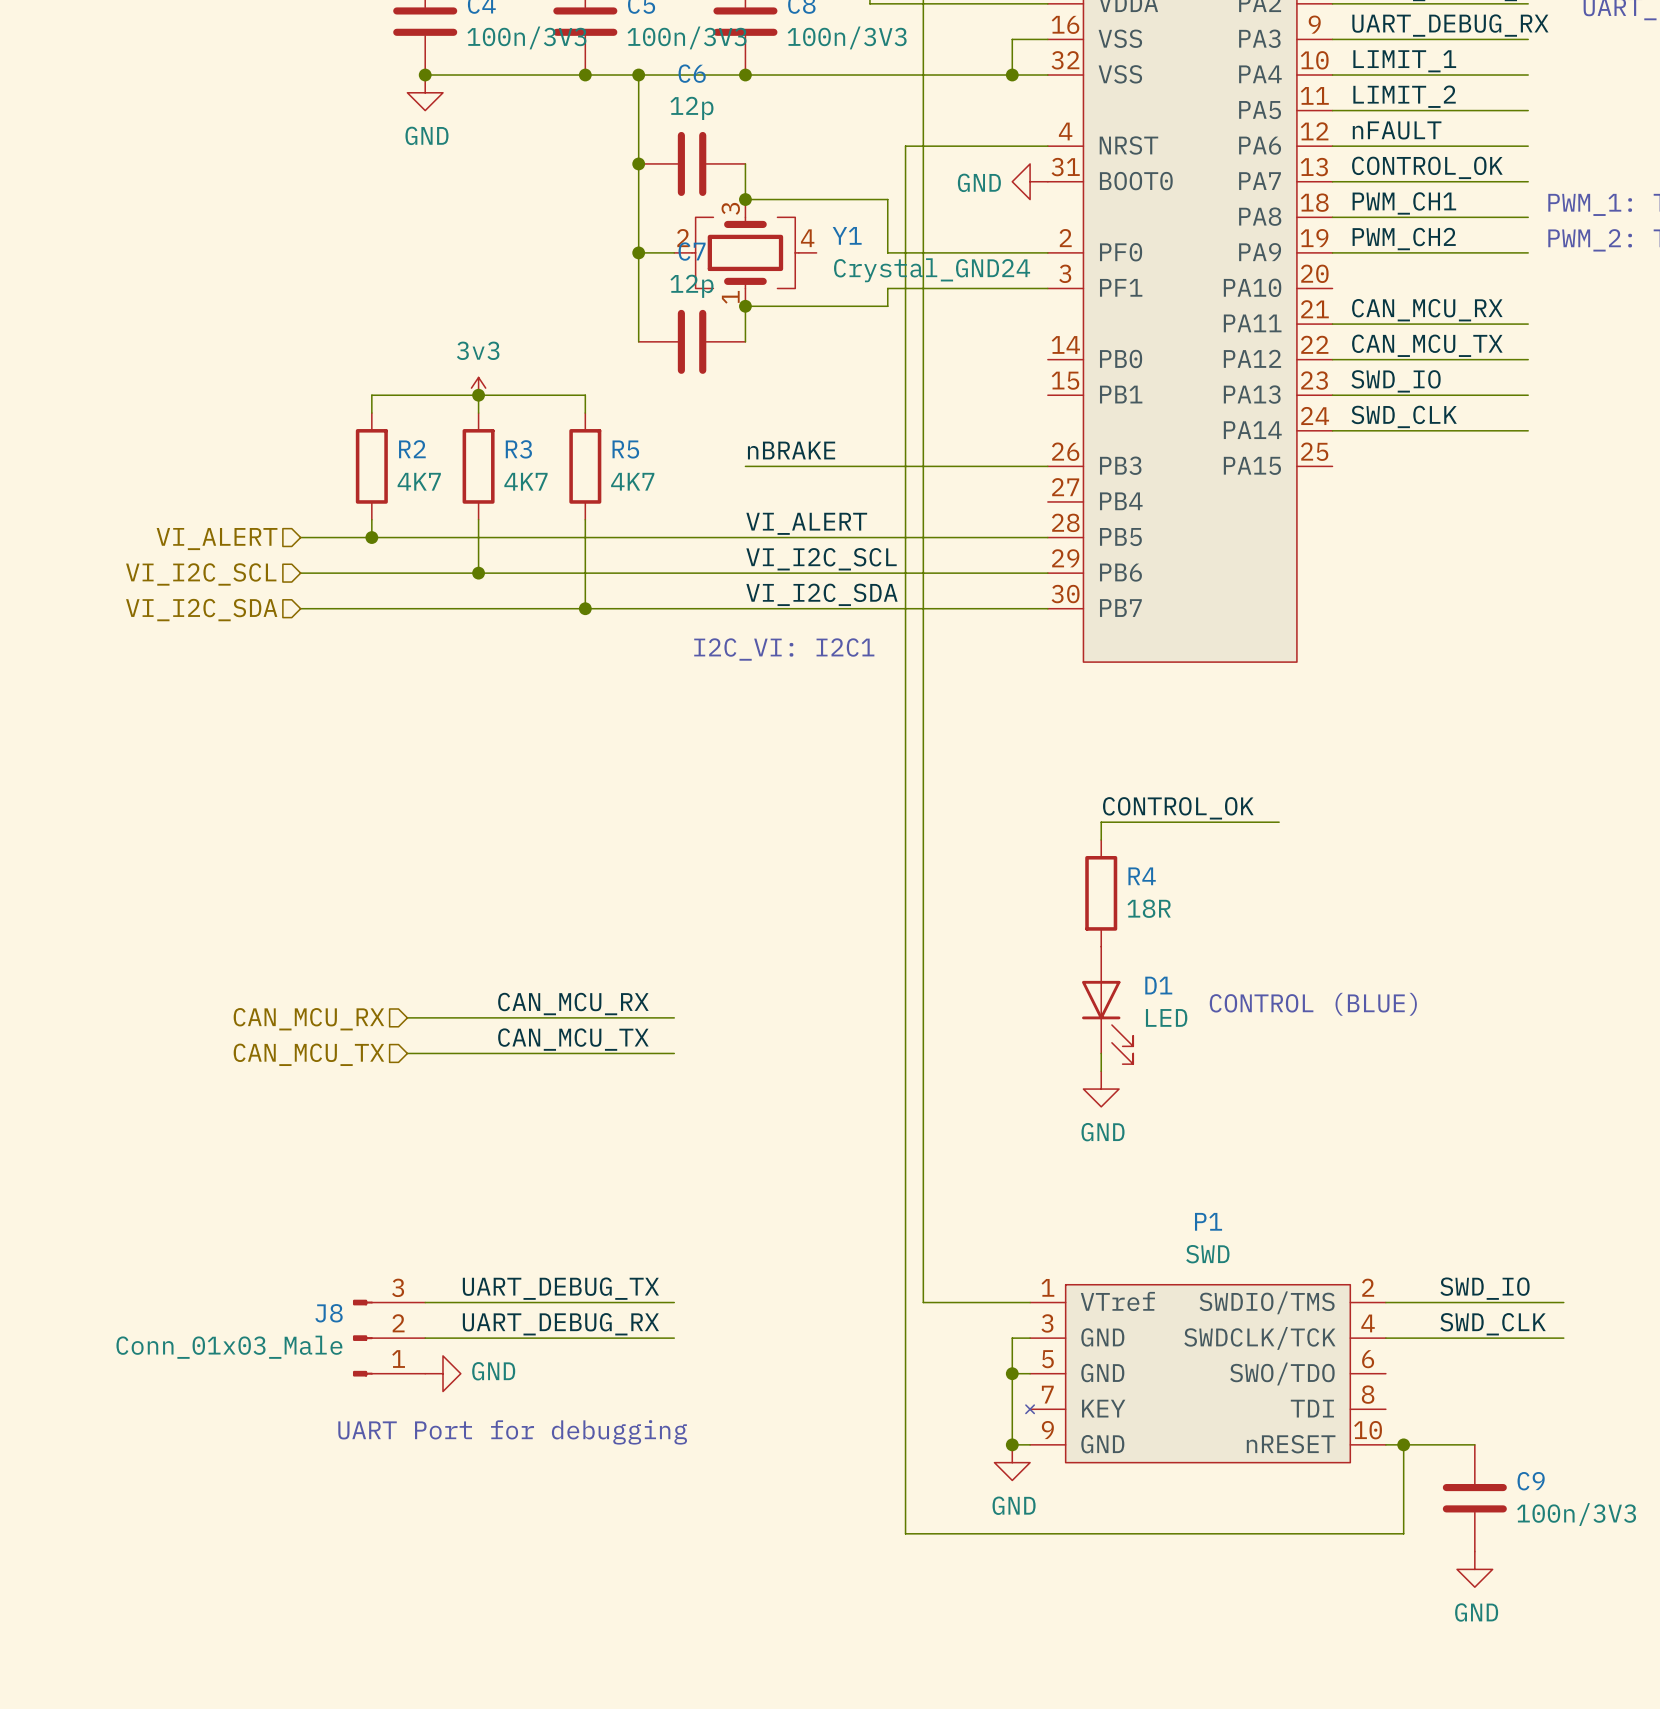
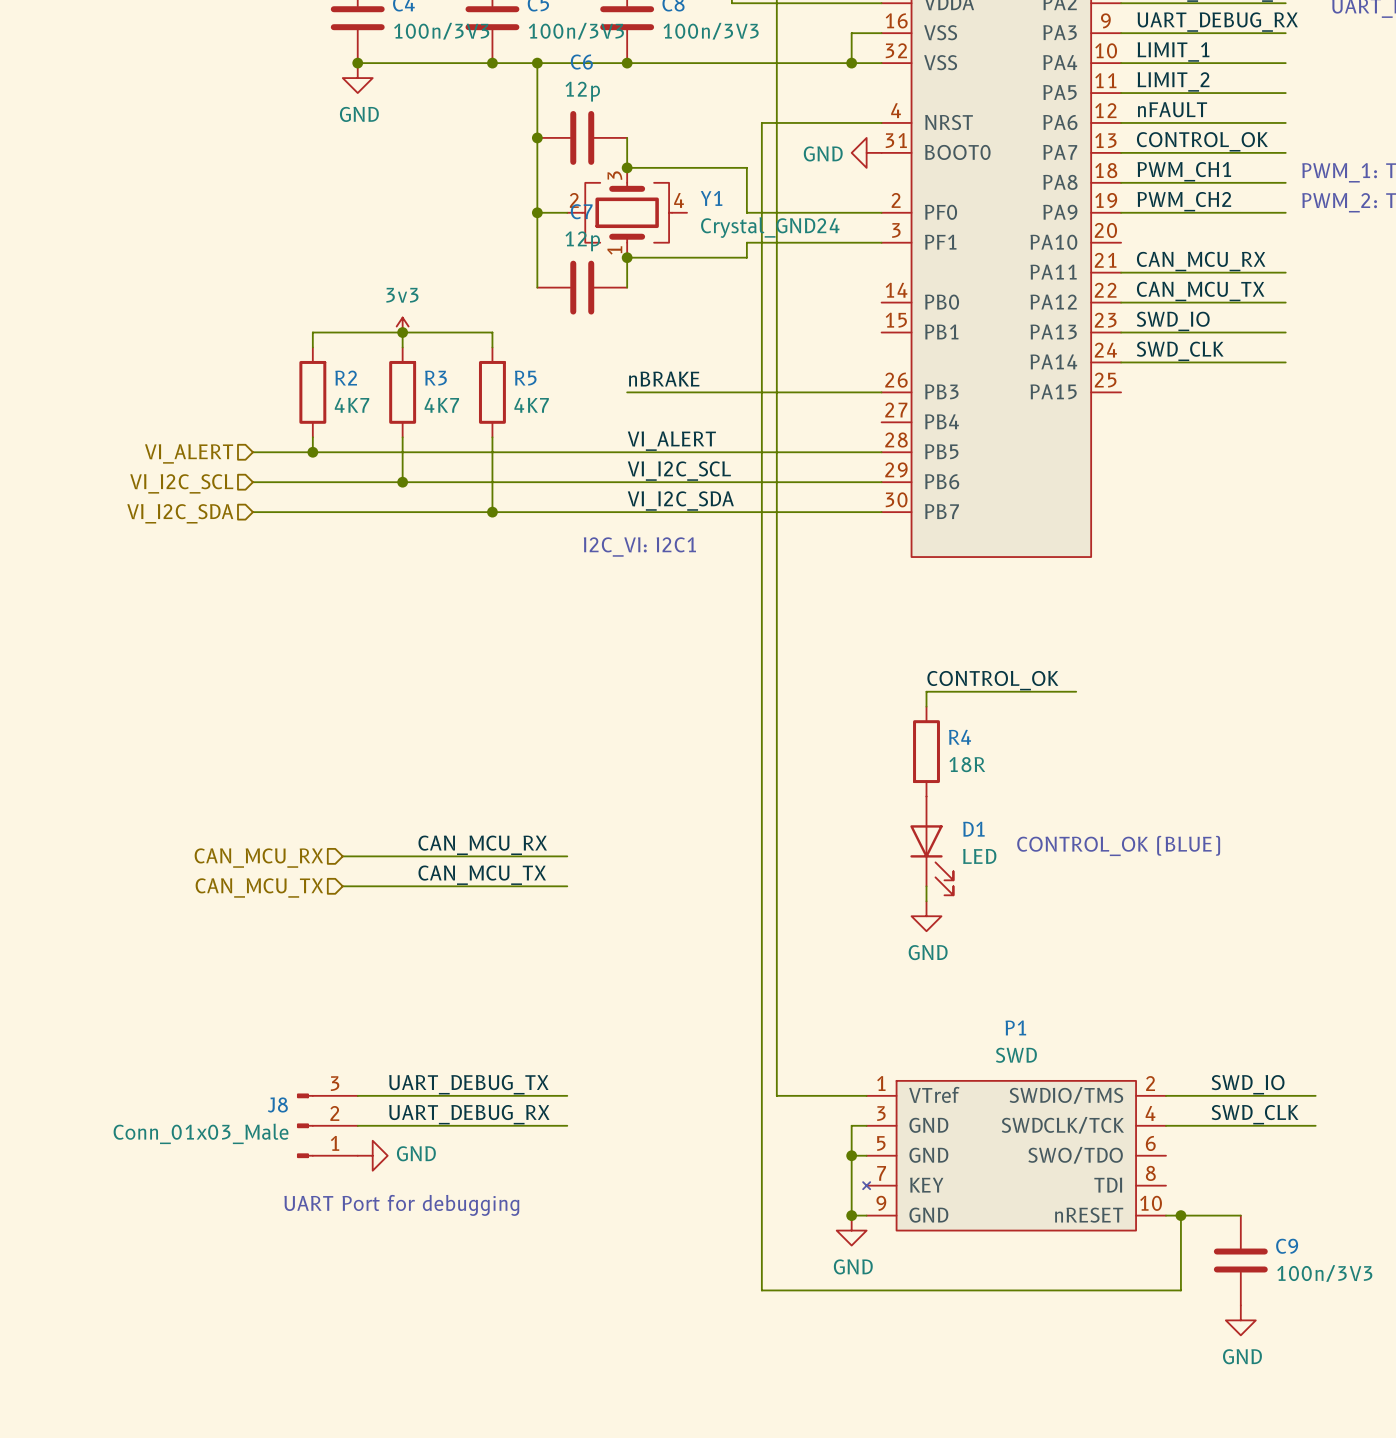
text: CONTROL (BLUE) (1313, 1004) -> CONTROL_OK (BLUE) (1118, 845)

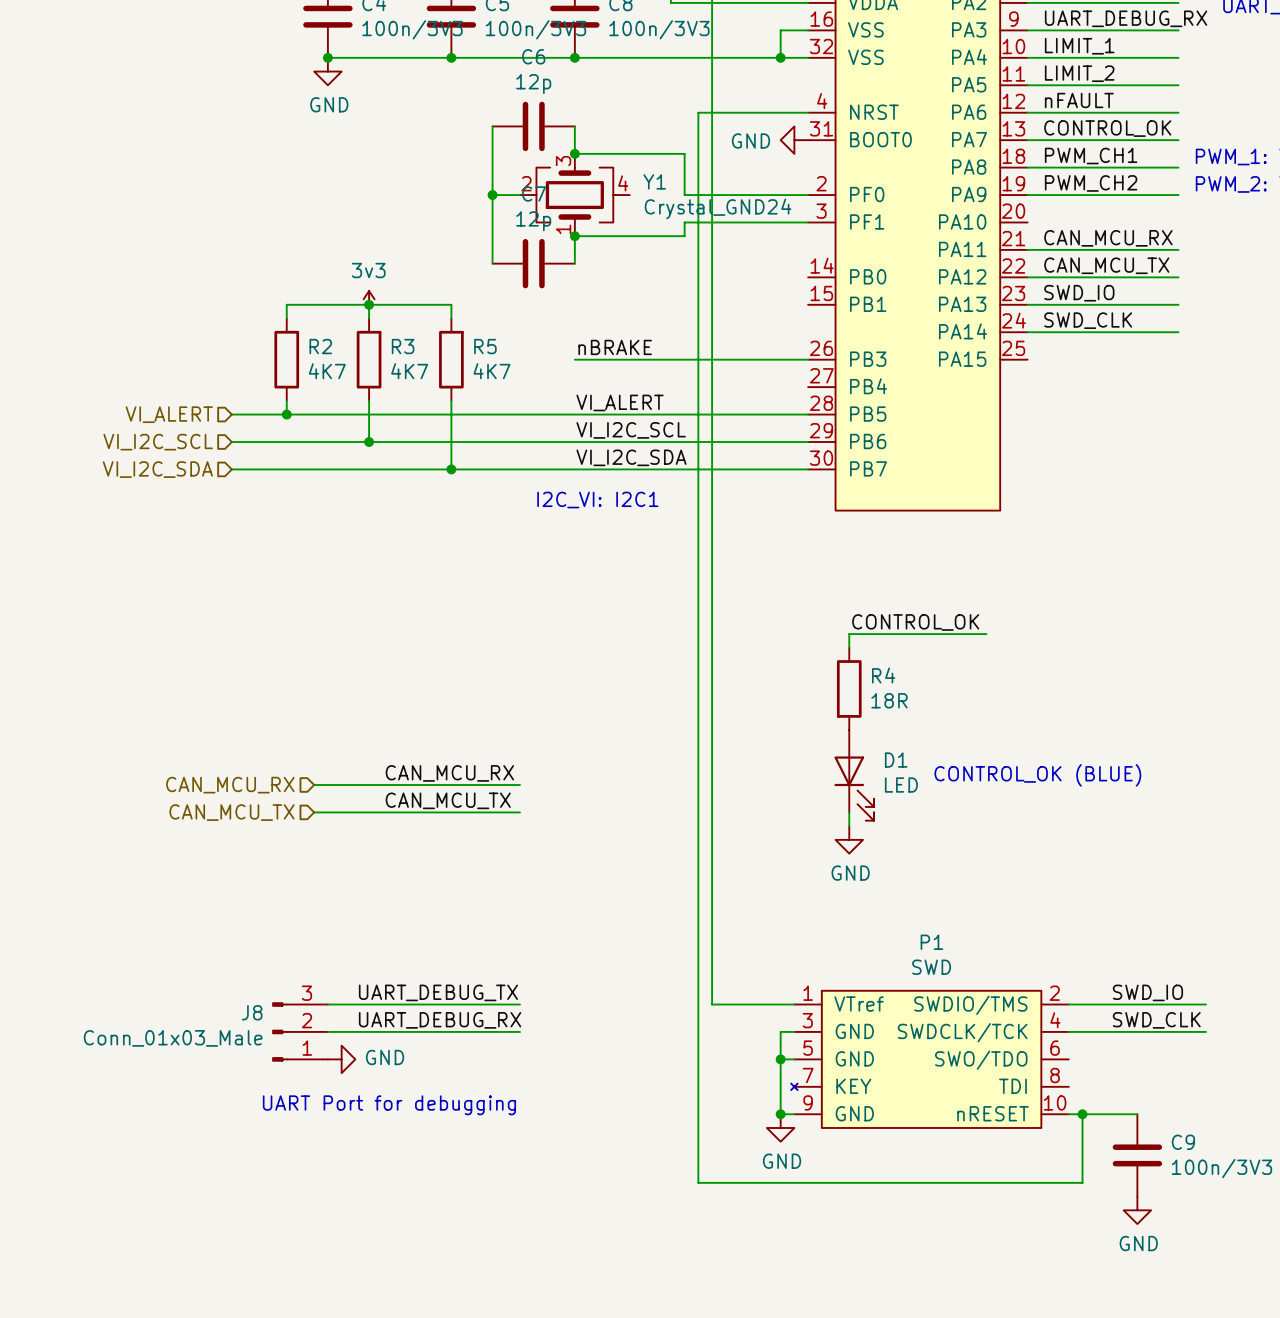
wire: (537, 63) (537, 137) -> none
junction: (537, 63) -> none
junction: (537, 137) -> none

